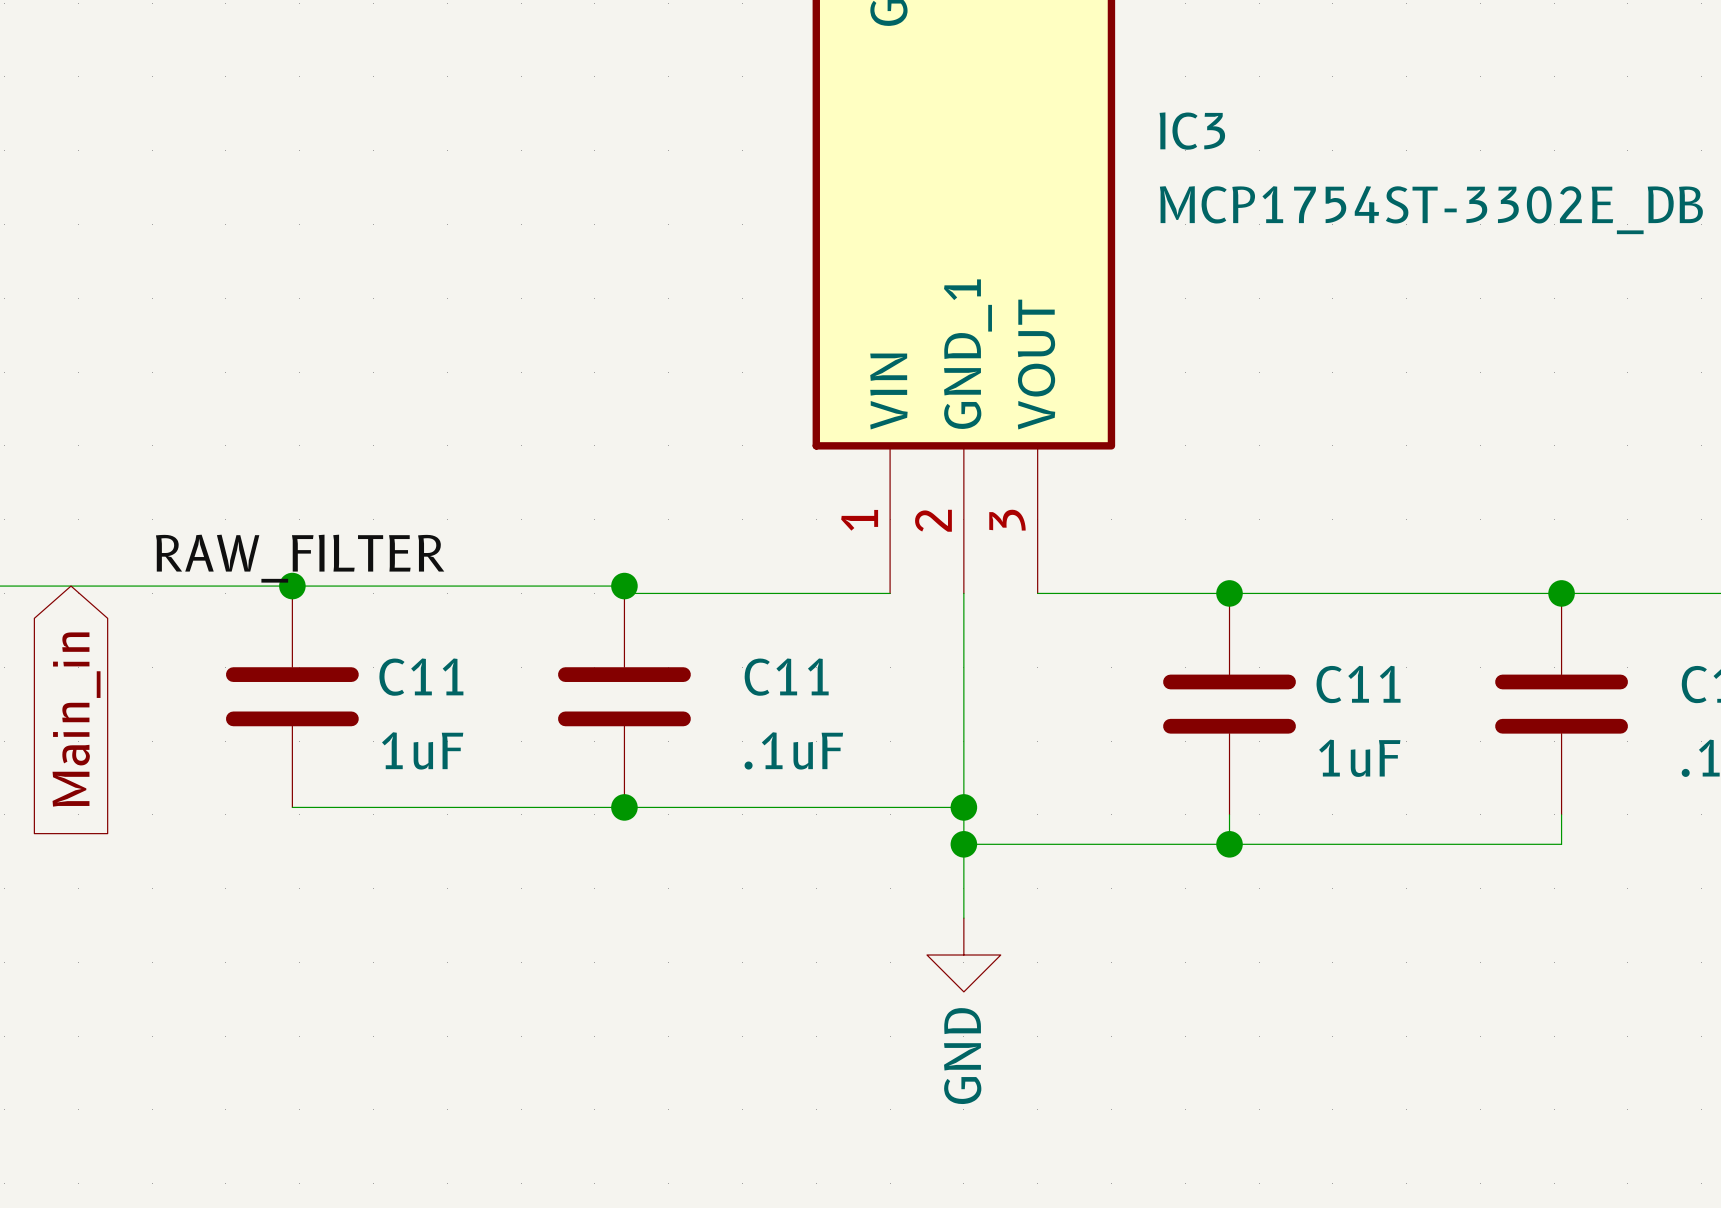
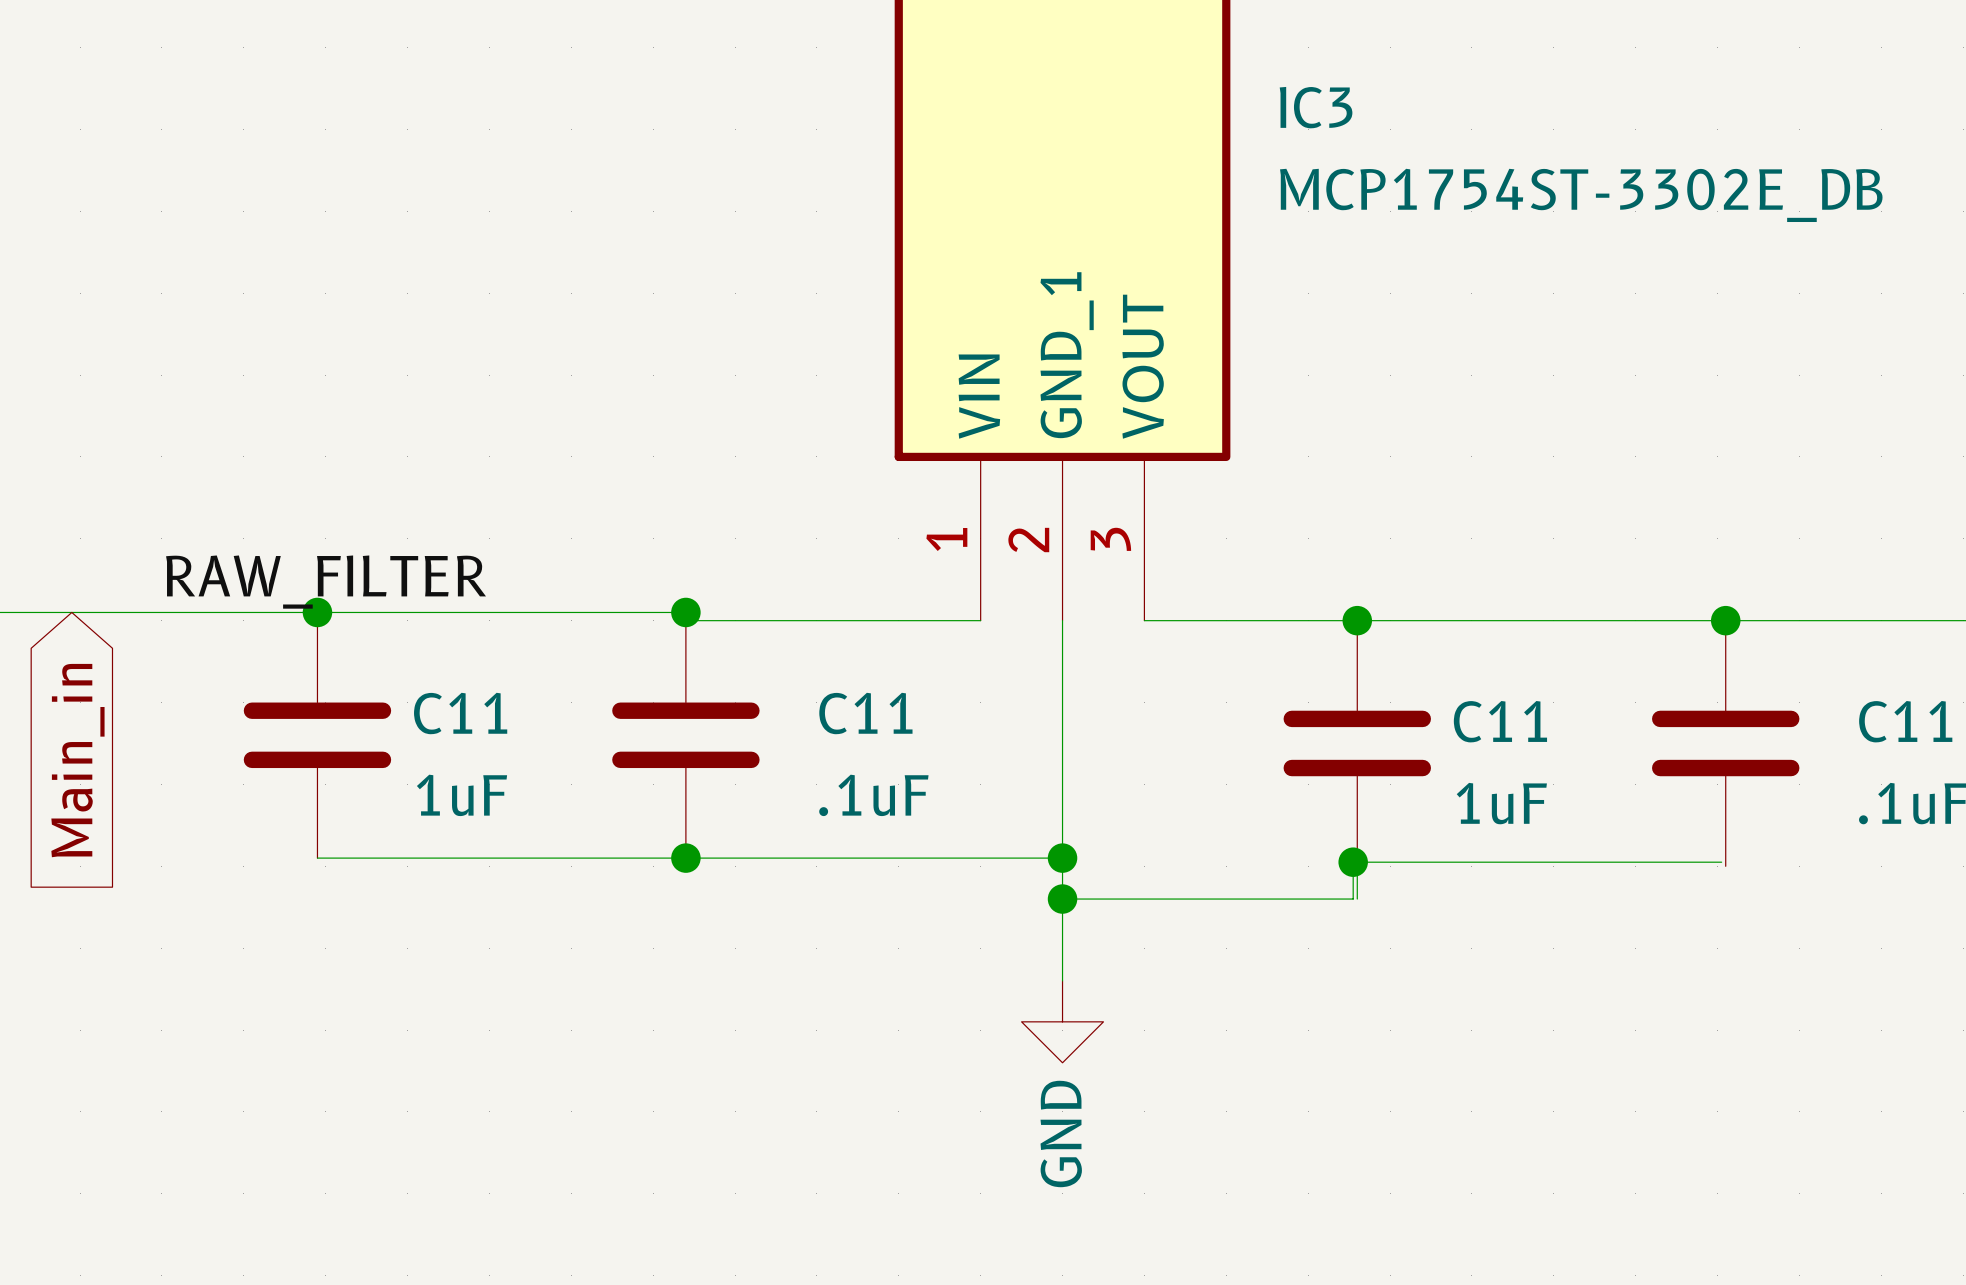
wire: (1561, 814) (1561, 844) (1225, 844) -> (1721, 862) (1353, 862) (1353, 899)
junction position: (1229, 844) -> (1353, 862)

